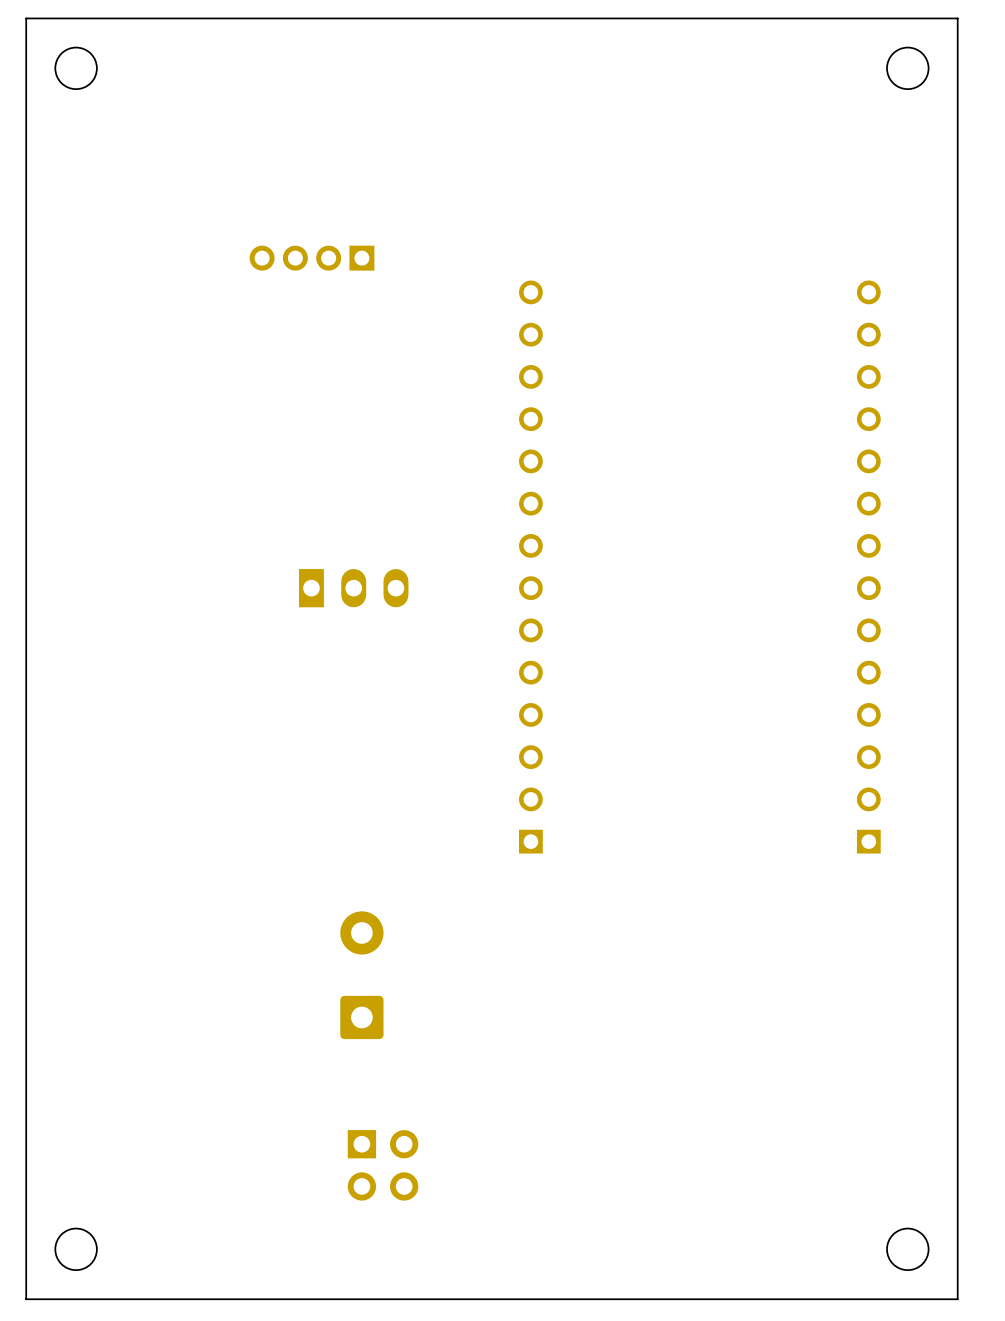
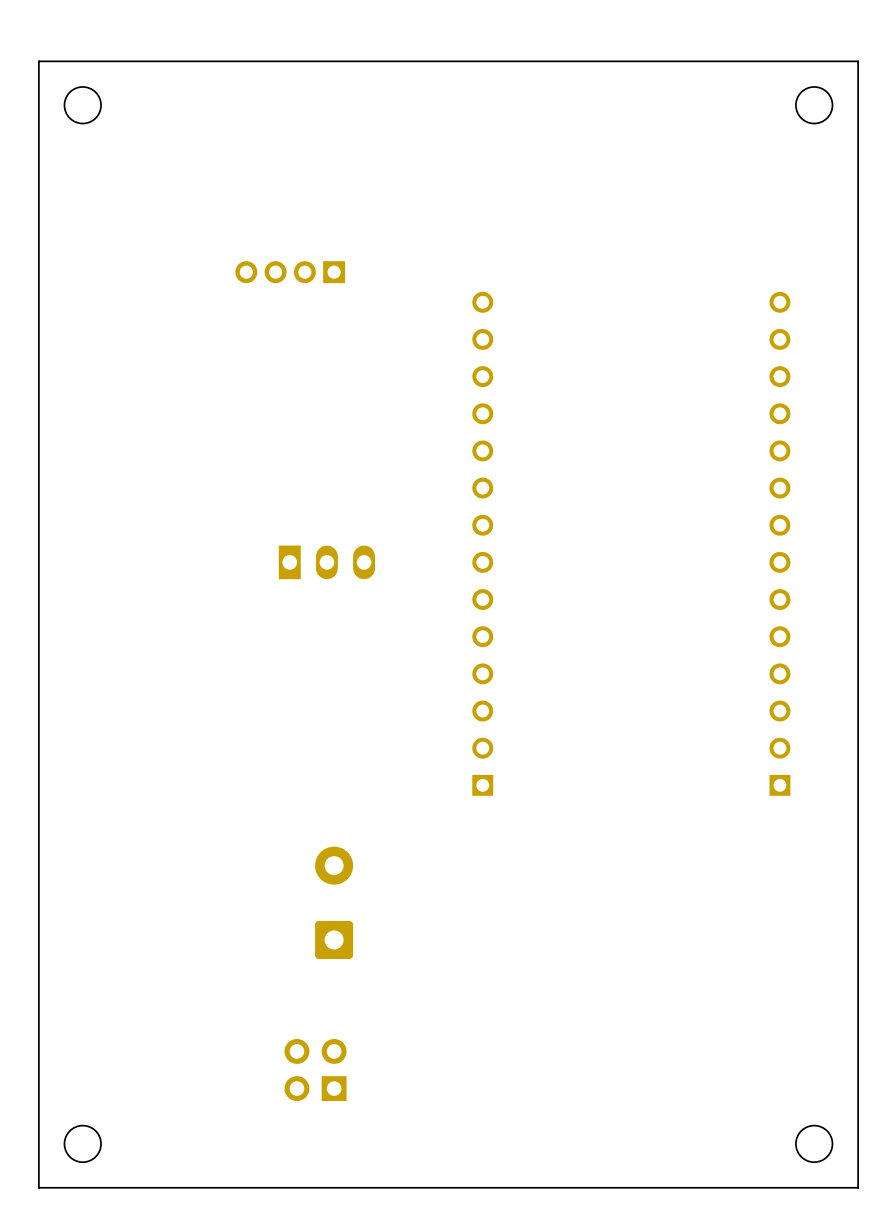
part rotation: 0° (383, 1165) -> 180° (315, 1070)

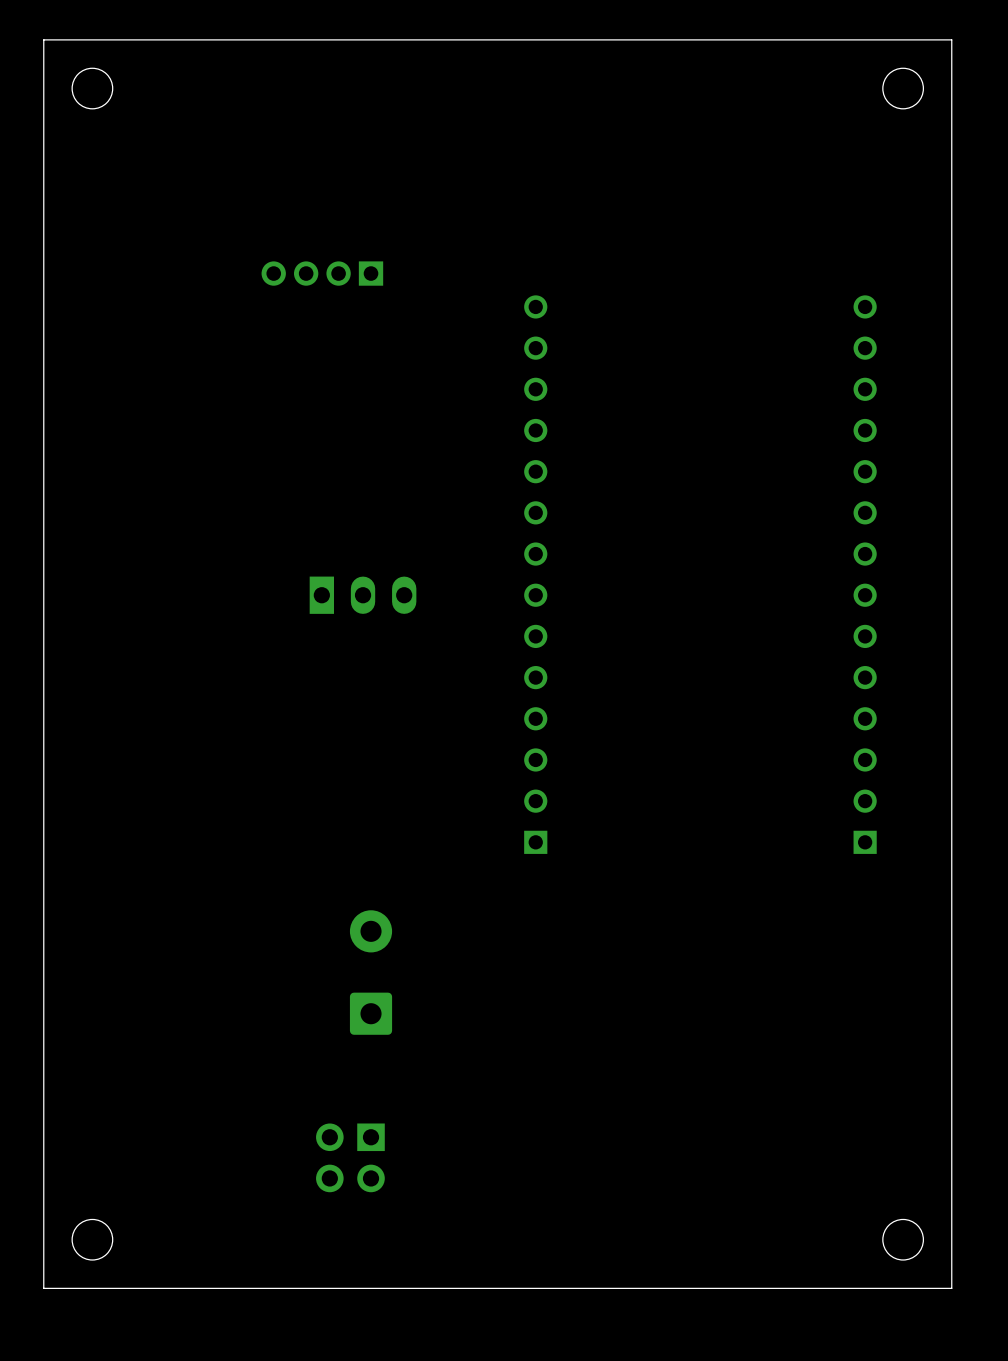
part rotation: 0° (315, 1070) -> 90° counterclockwise (350, 1157)

